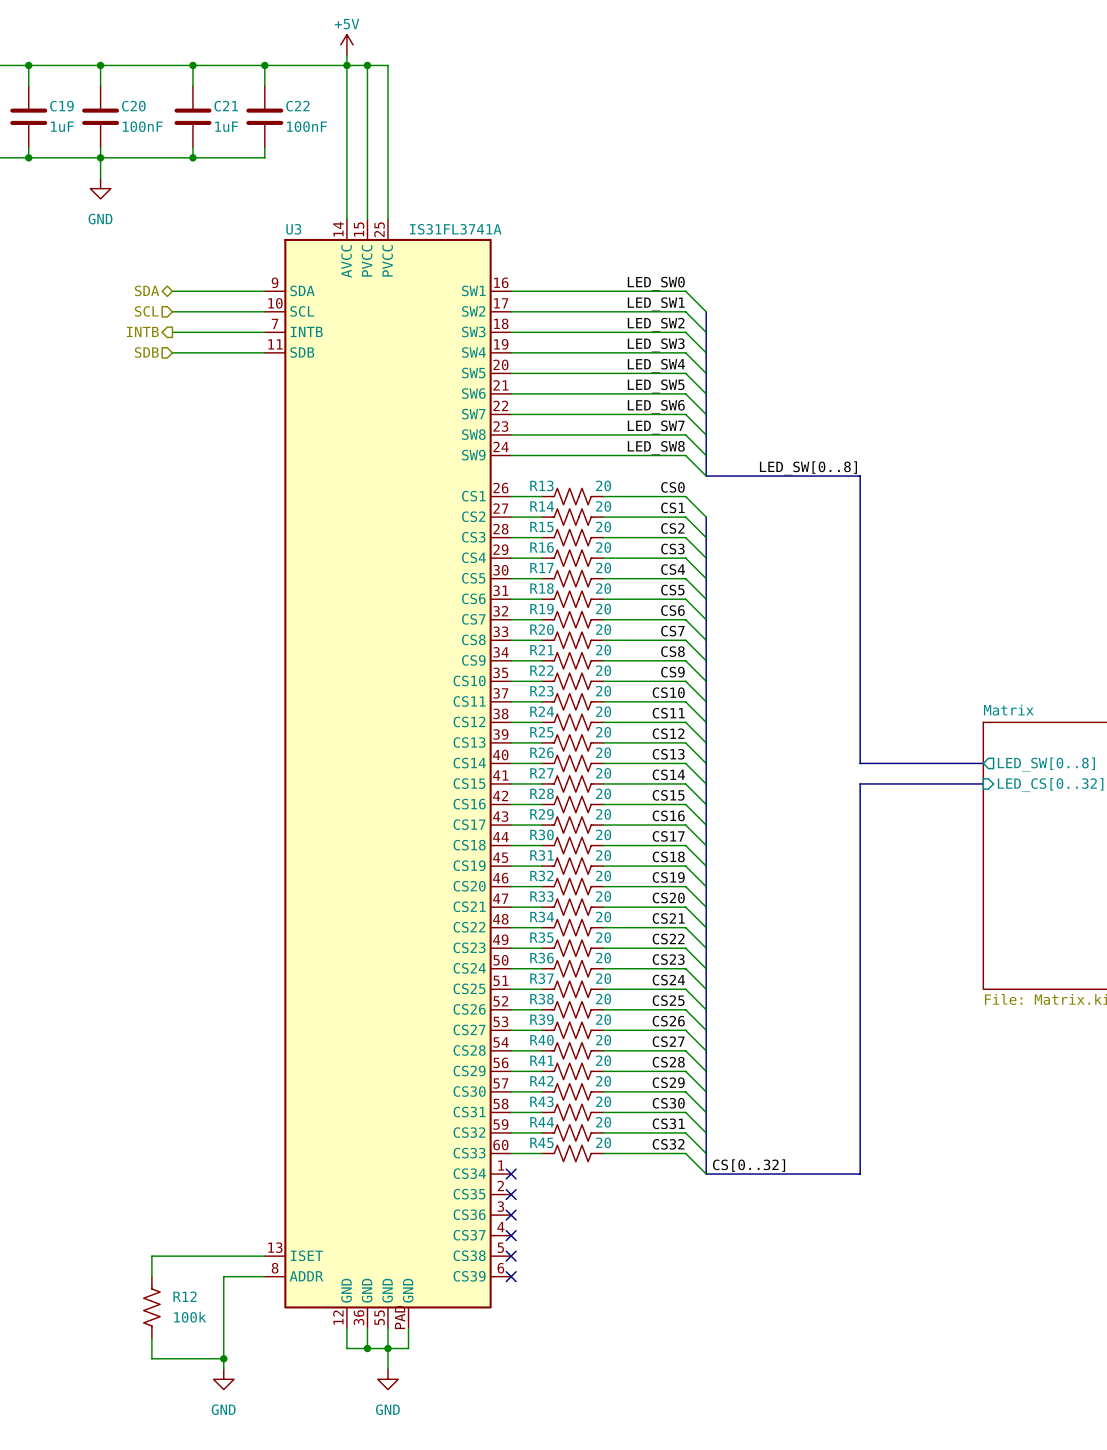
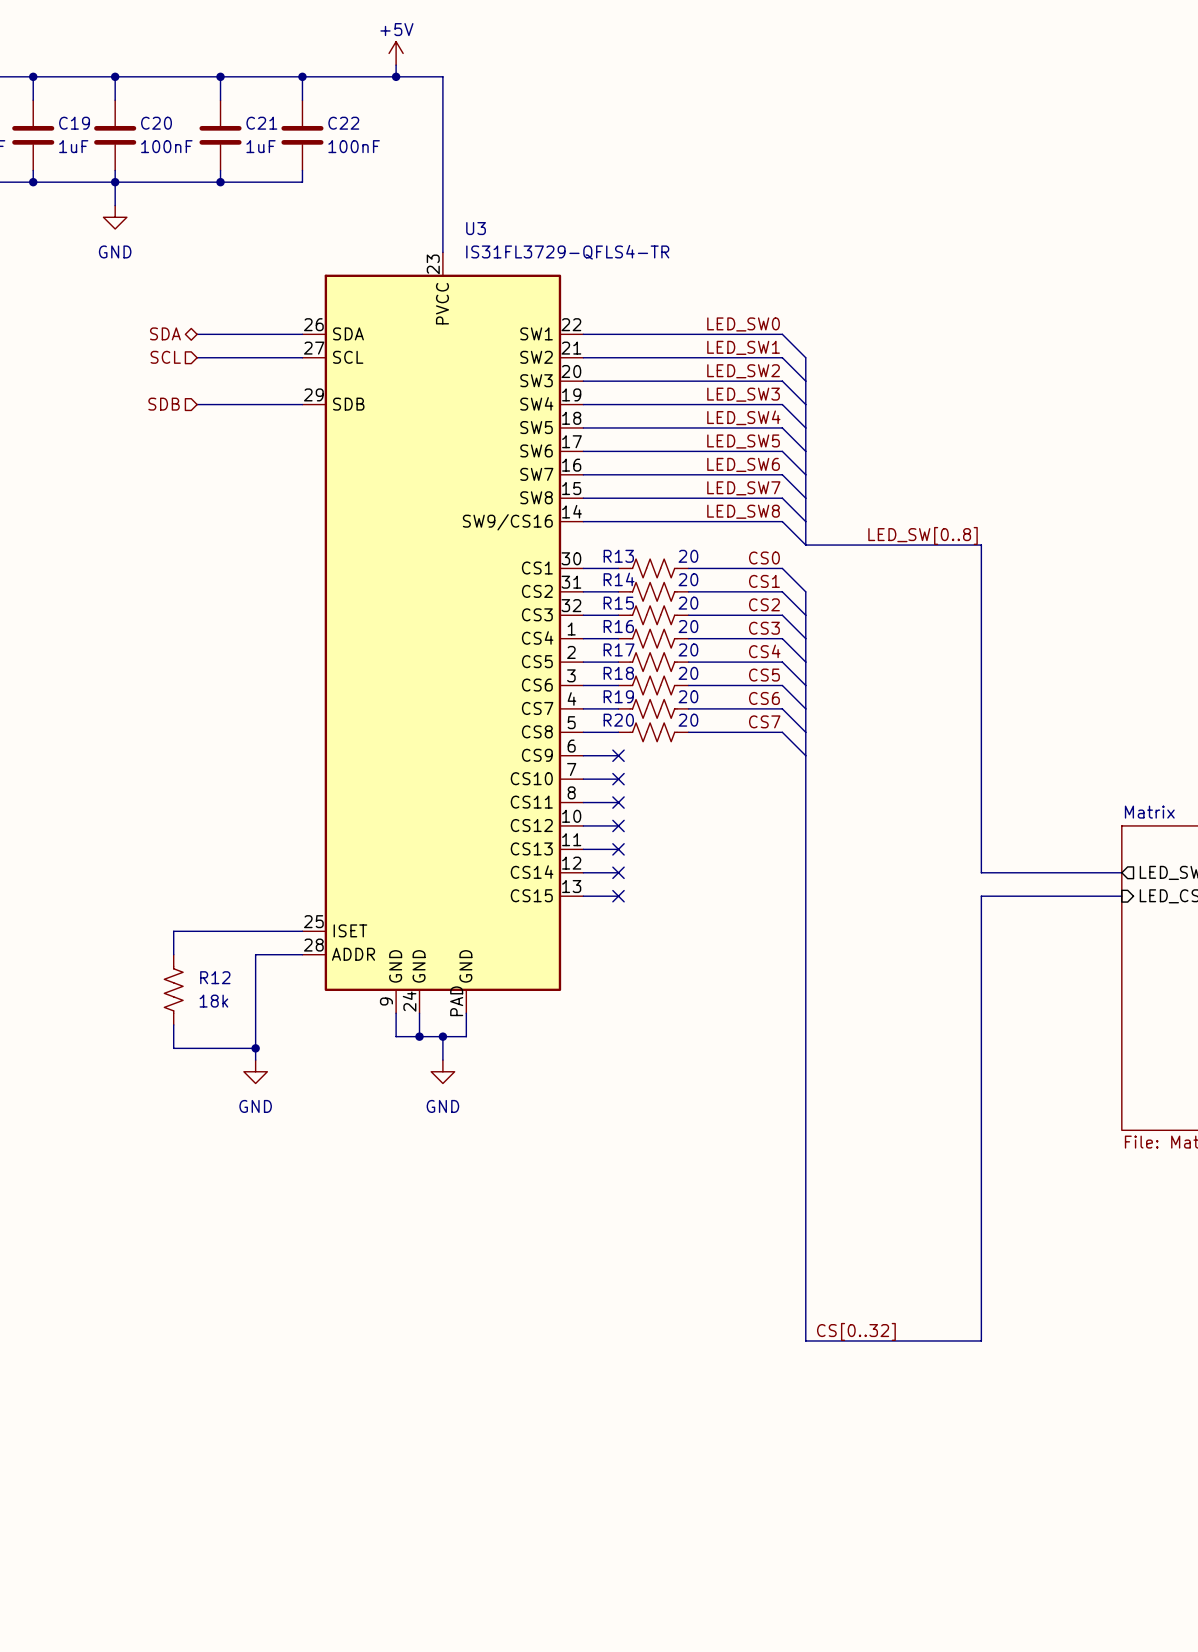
wire: (346, 65) (346, 219) -> none
wire: (367, 65) (367, 219) -> none
junction: (367, 65) -> none
U3 symbol: [264, 219, 512, 1328] -> [302, 252, 584, 1014]
U3 name position: U3 (293, 229) -> U3 (476, 228)
U3 value: IS31FL3741A (455, 229) -> IS31FL3729-QFLS4-TR (567, 252)
hierarchical label: INTB (142, 331) -> none
wire: (172, 332) (264, 332) -> none
label: CS8 (672, 651) -> none
no-connect mark: none -> (618, 755)
R21: 20 (572, 660) -> none
wire: (603, 660) (685, 660) (706, 681) -> none
label: CS9 (672, 672) -> none
no-connect mark: none -> (618, 779)
R22: 20 (572, 681) -> none
wire: (603, 681) (685, 681) (706, 701) -> none
label: CS10 (668, 692) -> none
no-connect mark: none -> (618, 802)
R23: 20 (572, 701) -> none
wire: (603, 701) (685, 701) (706, 722) -> none
label: CS11 (668, 713) -> none
no-connect mark: none -> (618, 825)
R24: 20 (572, 722) -> none
wire: (603, 722) (685, 722) (706, 742) -> none
label: CS12 (668, 733) -> none
no-connect mark: none -> (618, 849)
R25: 20 (572, 742) -> none
wire: (603, 742) (685, 742) (706, 763) -> none
label: CS13 (668, 754) -> none
no-connect mark: none -> (618, 872)
R26: 20 (572, 763) -> none
wire: (603, 763) (685, 763) (706, 783) -> none
label: CS14 (668, 774) -> none
no-connect mark: none -> (618, 896)
R27: 20 (572, 783) -> none
wire: (603, 783) (685, 783) (706, 804) -> none
label: CS15 (668, 795) -> none
wire: (511, 804) (541, 804) -> none
R28: 20 (572, 804) -> none
wire: (603, 804) (685, 804) (706, 825) -> none
wire: none -> (302, 931) (173, 931) (173, 954)
label: CS16 (668, 815) -> none
wire: (511, 825) (541, 825) -> none
R29: 20 (572, 825) -> none
wire: (603, 825) (685, 825) (706, 845) -> none
wire: none -> (302, 954) (255, 954) (255, 1060)
label: CS17 (668, 836) -> none
wire: (511, 845) (541, 845) -> none
R30: 20 (572, 845) -> none
wire: (603, 845) (685, 845) (706, 866) -> none
label: CS18 (668, 856) -> none
wire: (511, 866) (541, 866) -> none
R31: 20 (572, 866) -> none
wire: (603, 866) (685, 866) (706, 886) -> none
label: CS19 (668, 877) -> none
wire: (511, 886) (541, 886) -> none
R32: 20 (572, 886) -> none
wire: (603, 886) (685, 886) (706, 907) -> none
wire: none -> (173, 1024) (173, 1048) (255, 1048)
label: CS20 (668, 897) -> none
junction: none -> (419, 1036)
junction: none -> (442, 1036)
wire: (511, 907) (541, 907) -> none
R33: 20 (572, 907) -> none
wire: (603, 907) (685, 907) (706, 927) -> none
junction: none -> (255, 1048)
label: CS21 (668, 918) -> none
wire: (511, 927) (541, 927) -> none
R34: 20 (572, 927) -> none
wire: (603, 927) (685, 927) (706, 948) -> none
power symbol: none -> GND (255, 1071)
power symbol: none -> GND (442, 1071)
label: CS22 (668, 939) -> none
wire: (511, 948) (541, 948) -> none
R35: 20 (572, 948) -> none
wire: (603, 948) (685, 948) (706, 968) -> none
label: CS23 (668, 959) -> none
wire: (511, 968) (541, 968) -> none
R36: 20 (572, 968) -> none
wire: (603, 968) (685, 968) (706, 989) -> none
label: CS24 (668, 980) -> none
wire: (511, 989) (541, 989) -> none
R37: 20 (572, 989) -> none
wire: (603, 989) (685, 989) (706, 1009) -> none
label: CS25 (668, 1000) -> none
wire: (511, 1009) (541, 1009) -> none
R38: 20 (572, 1009) -> none
wire: (603, 1009) (685, 1009) (706, 1030) -> none
label: CS26 (668, 1021) -> none
wire: (511, 1030) (541, 1030) -> none
R39: 20 (572, 1030) -> none
wire: (603, 1030) (685, 1030) (706, 1050) -> none
label: CS27 (668, 1041) -> none
wire: (511, 1050) (541, 1050) -> none
R40: 20 (572, 1050) -> none
wire: (603, 1050) (685, 1050) (706, 1071) -> none
label: CS28 (668, 1062) -> none
wire: (511, 1071) (541, 1071) -> none
R41: 20 (572, 1071) -> none
wire: (603, 1071) (685, 1071) (706, 1091) -> none
label: CS29 (668, 1082) -> none
wire: (511, 1091) (541, 1091) -> none
R42: 20 (572, 1091) -> none
wire: (603, 1091) (685, 1091) (706, 1112) -> none
label: CS30 (668, 1103) -> none
wire: (511, 1112) (541, 1112) -> none
R43: 20 (572, 1112) -> none
wire: (603, 1112) (685, 1112) (706, 1132) -> none
label: CS31 (668, 1123) -> none
wire: (511, 1132) (541, 1132) -> none
R44: 20 (572, 1132) -> none
wire: (603, 1132) (685, 1132) (706, 1153) -> none
label: CS32 (668, 1144) -> none
wire: (511, 1153) (541, 1153) -> none
R45: 20 (572, 1153) -> none
wire: (603, 1153) (685, 1153) (706, 1174) -> none
no-connect mark: (511, 1174) -> none
no-connect mark: (511, 1194) -> none
no-connect mark: (511, 1215) -> none
no-connect mark: (511, 1235) -> none
wire: (264, 1256) (151, 1256) (151, 1276) -> none
no-connect mark: (511, 1256) -> none
wire: (264, 1276) (223, 1276) (223, 1369) -> none
no-connect mark: (511, 1276) -> none
R12 position: (151, 1307) -> (173, 989)
R12 value: 100k (190, 1317) -> 18k (213, 1001)
wire: (346, 1327) (346, 1348) (408, 1348) (408, 1327) -> none
wire: (367, 1327) (367, 1348) -> none
wire: (387, 1327) (387, 1369) -> none
wire: (151, 1338) (151, 1358) (223, 1358) -> none
junction: (367, 1348) -> none
junction: (387, 1348) -> none
junction: (223, 1358) -> none
power symbol: GND (223, 1379) -> none
power symbol: GND (387, 1379) -> none

